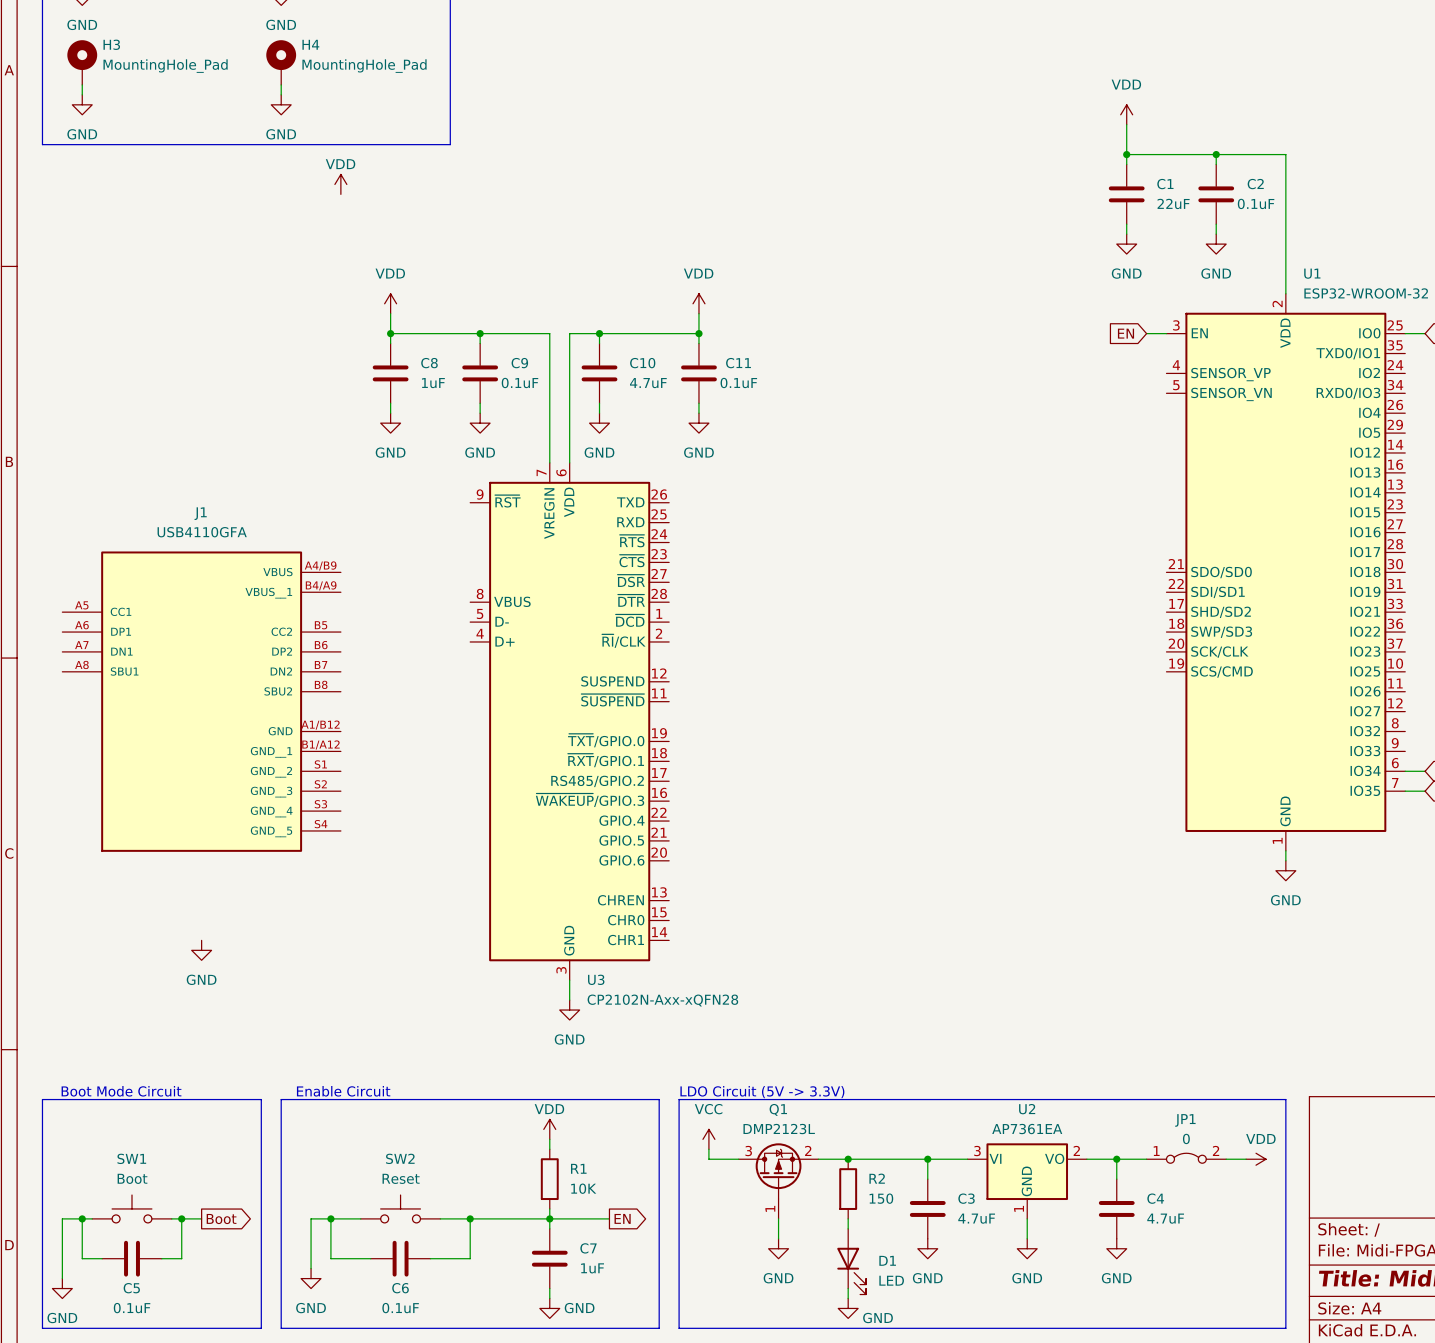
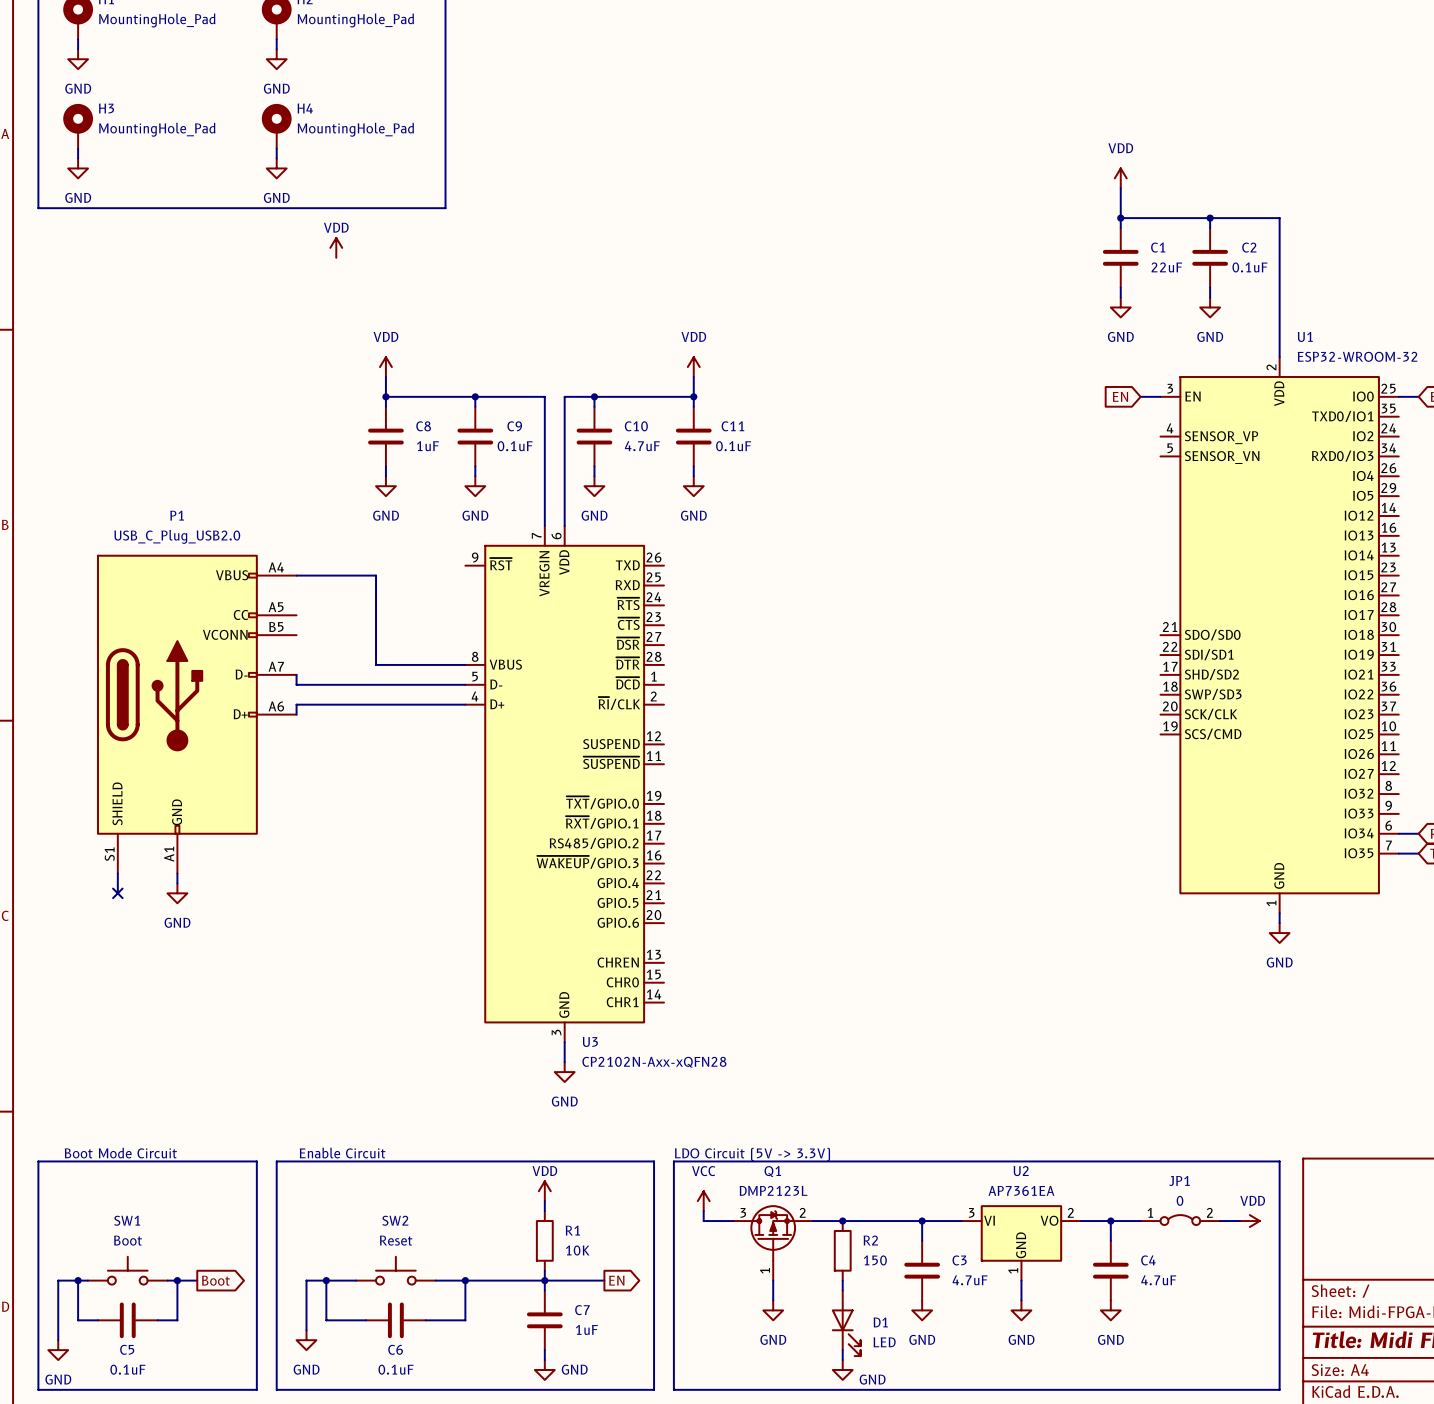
wire: none -> (296, 575) (376, 575) (376, 664) (465, 664)
wire: none -> (296, 674) (296, 684) (465, 684)
wire: none -> (465, 704) (296, 704) (296, 714)
P1: none -> USB_C_Plug_USB2.0 (196, 714)
J1: USB4110GFA (201, 701) -> none
no-connect mark: none -> (117, 893)
power symbol position: GND (201, 950) -> GND (177, 893)

